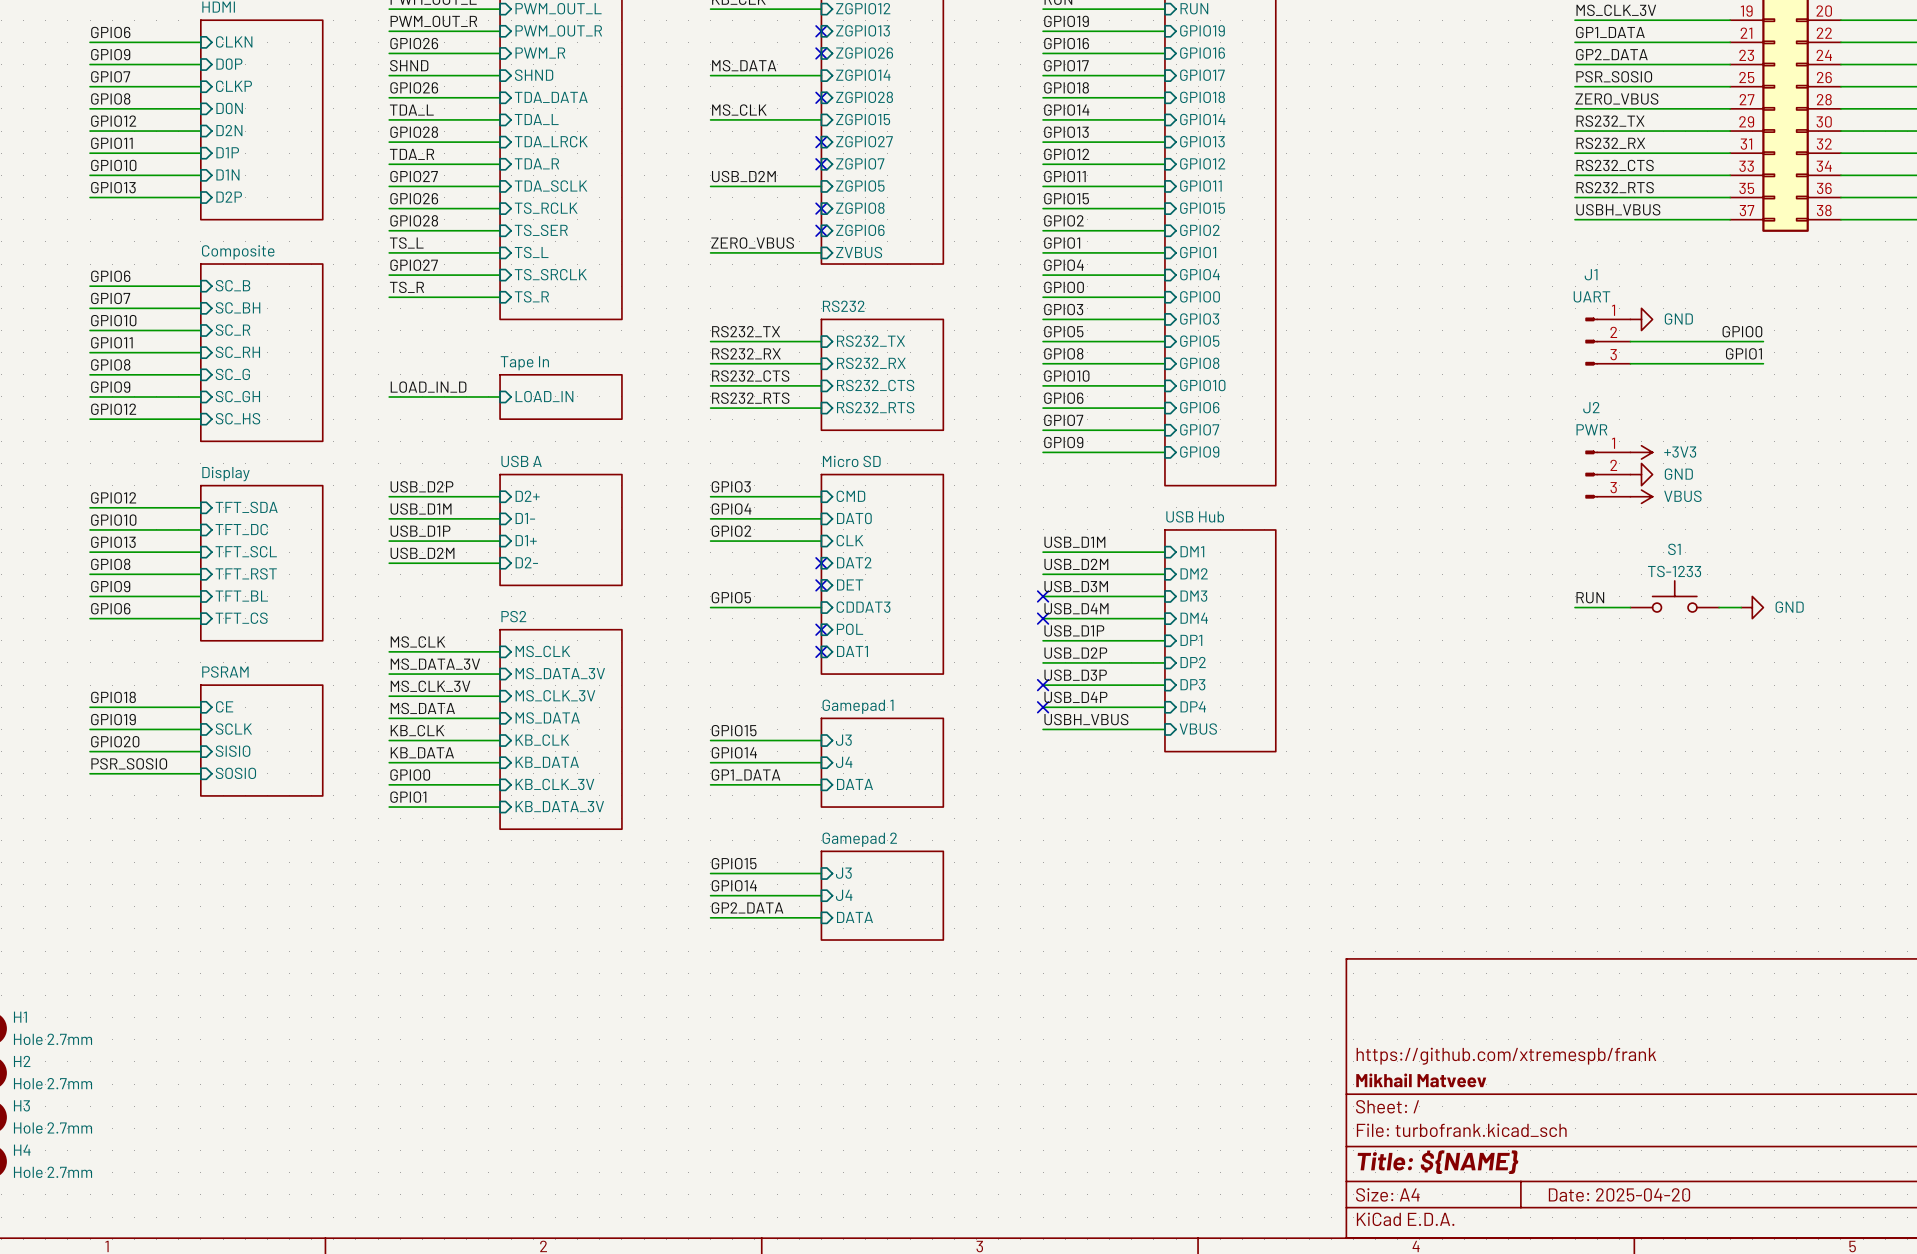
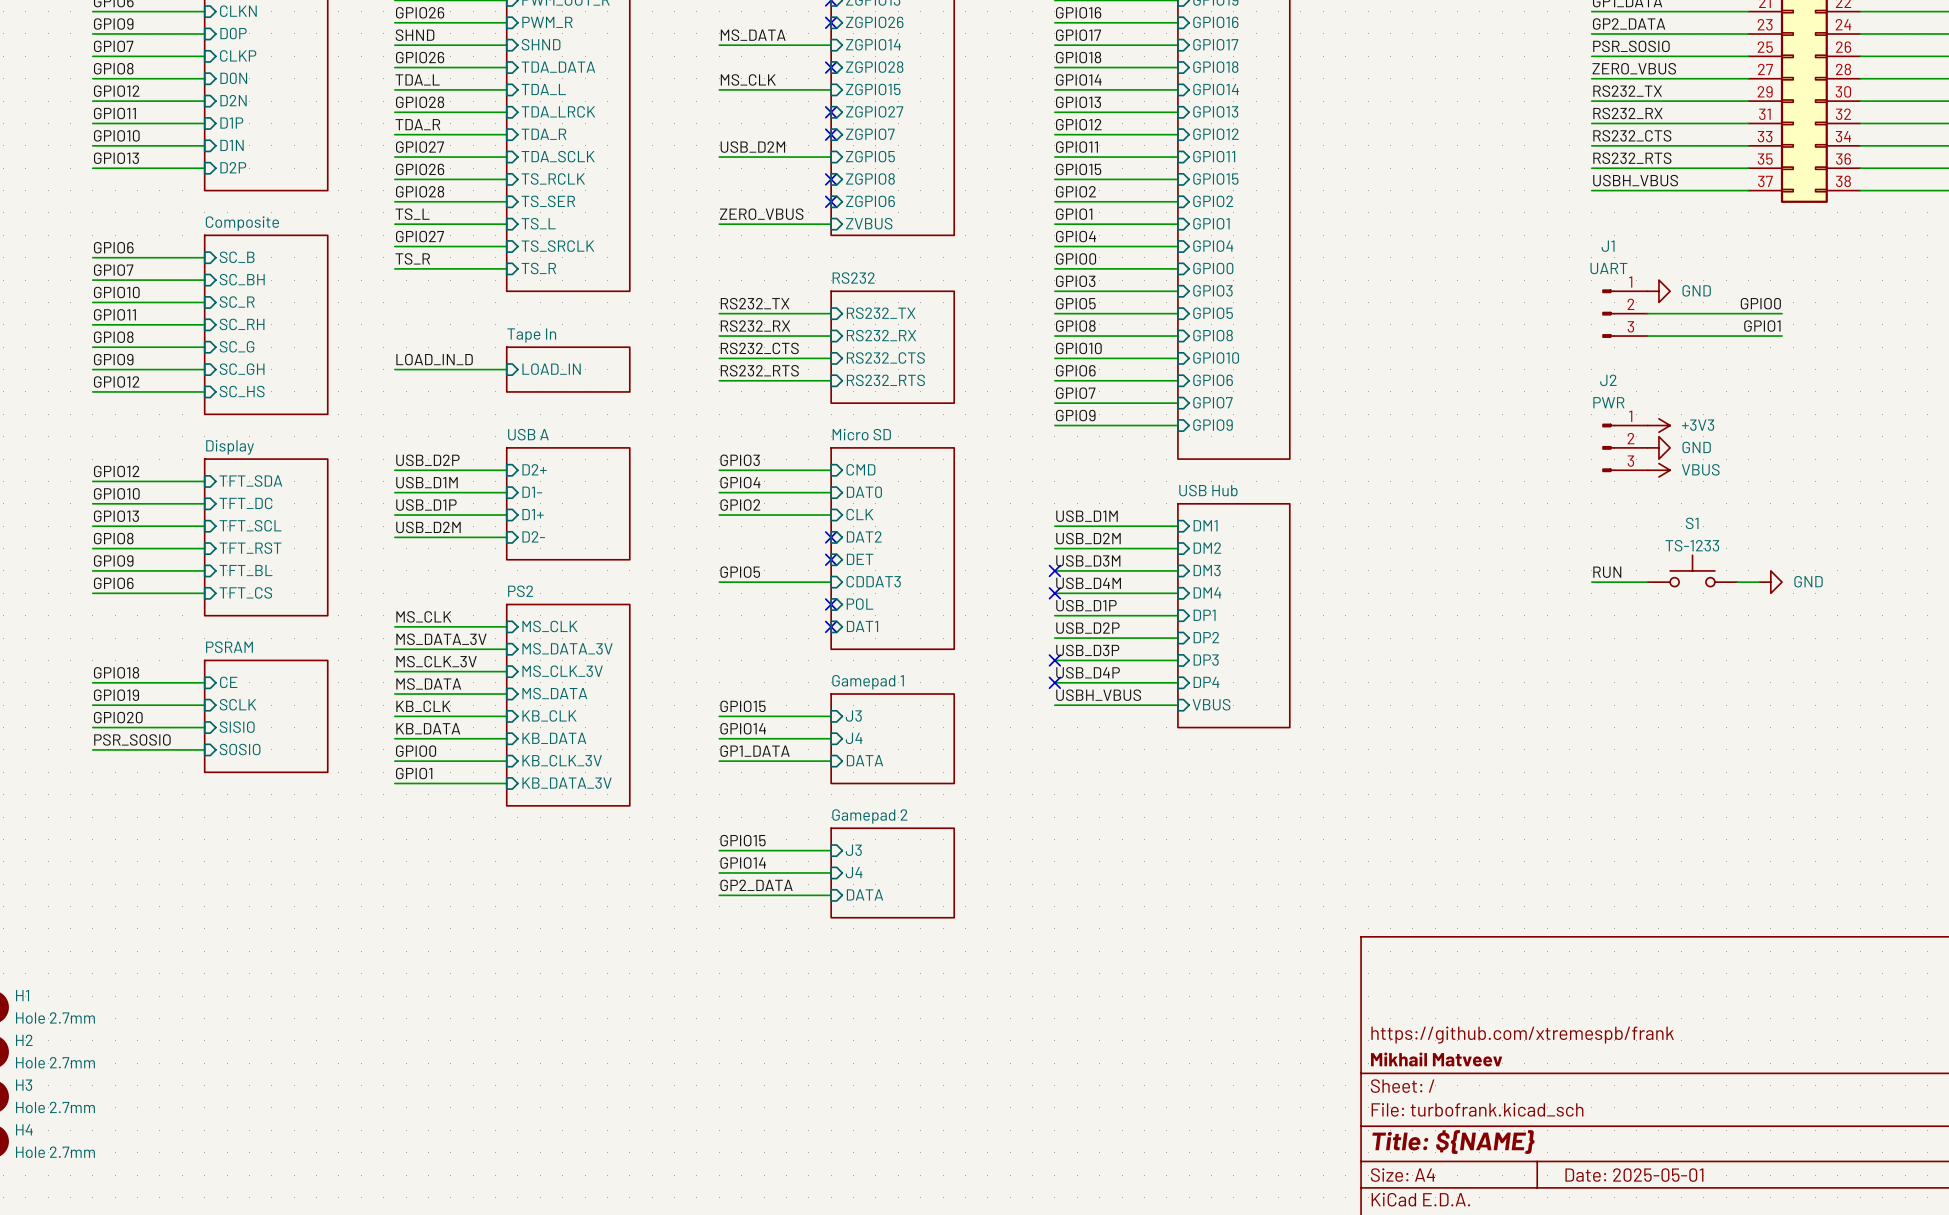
title block: Date: 2025-04-20 (1619, 1194) -> Date: 2025-05-01 (1634, 1175)

